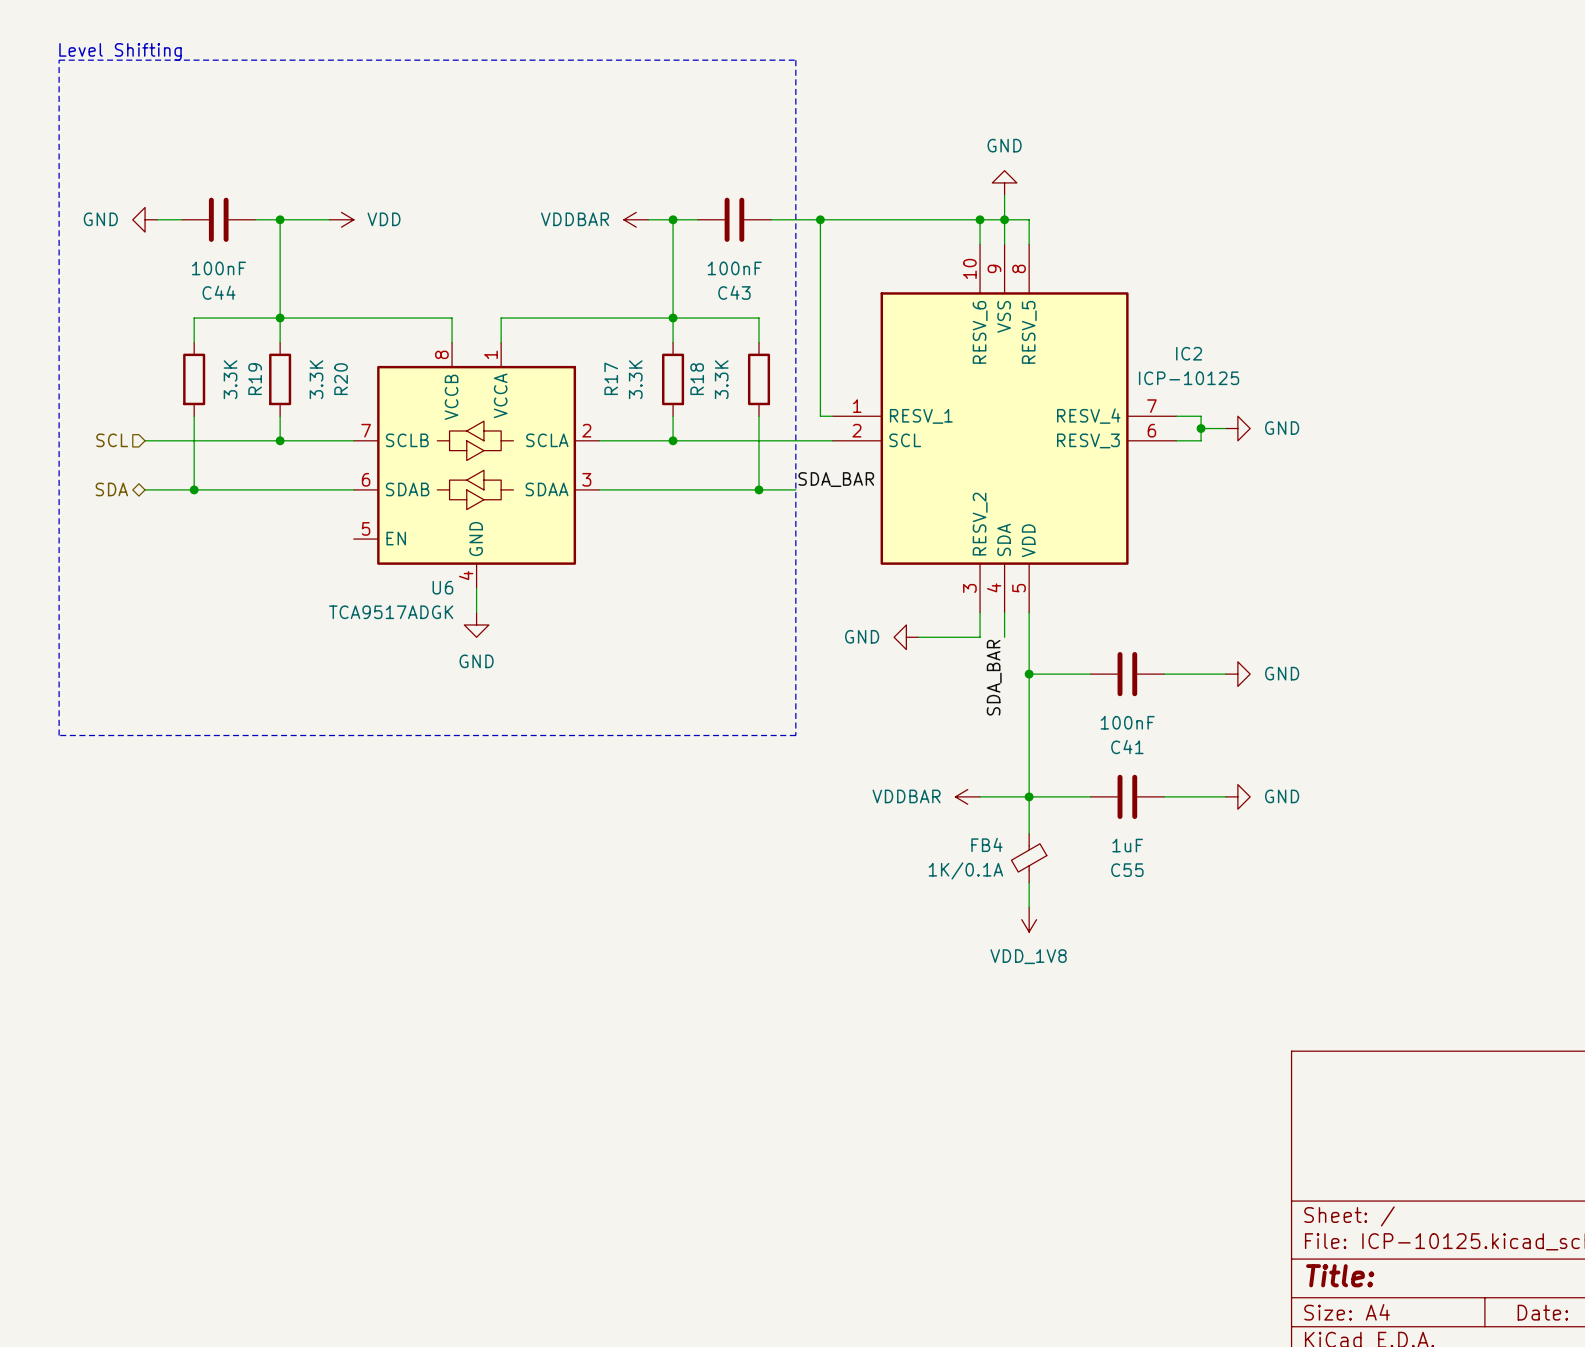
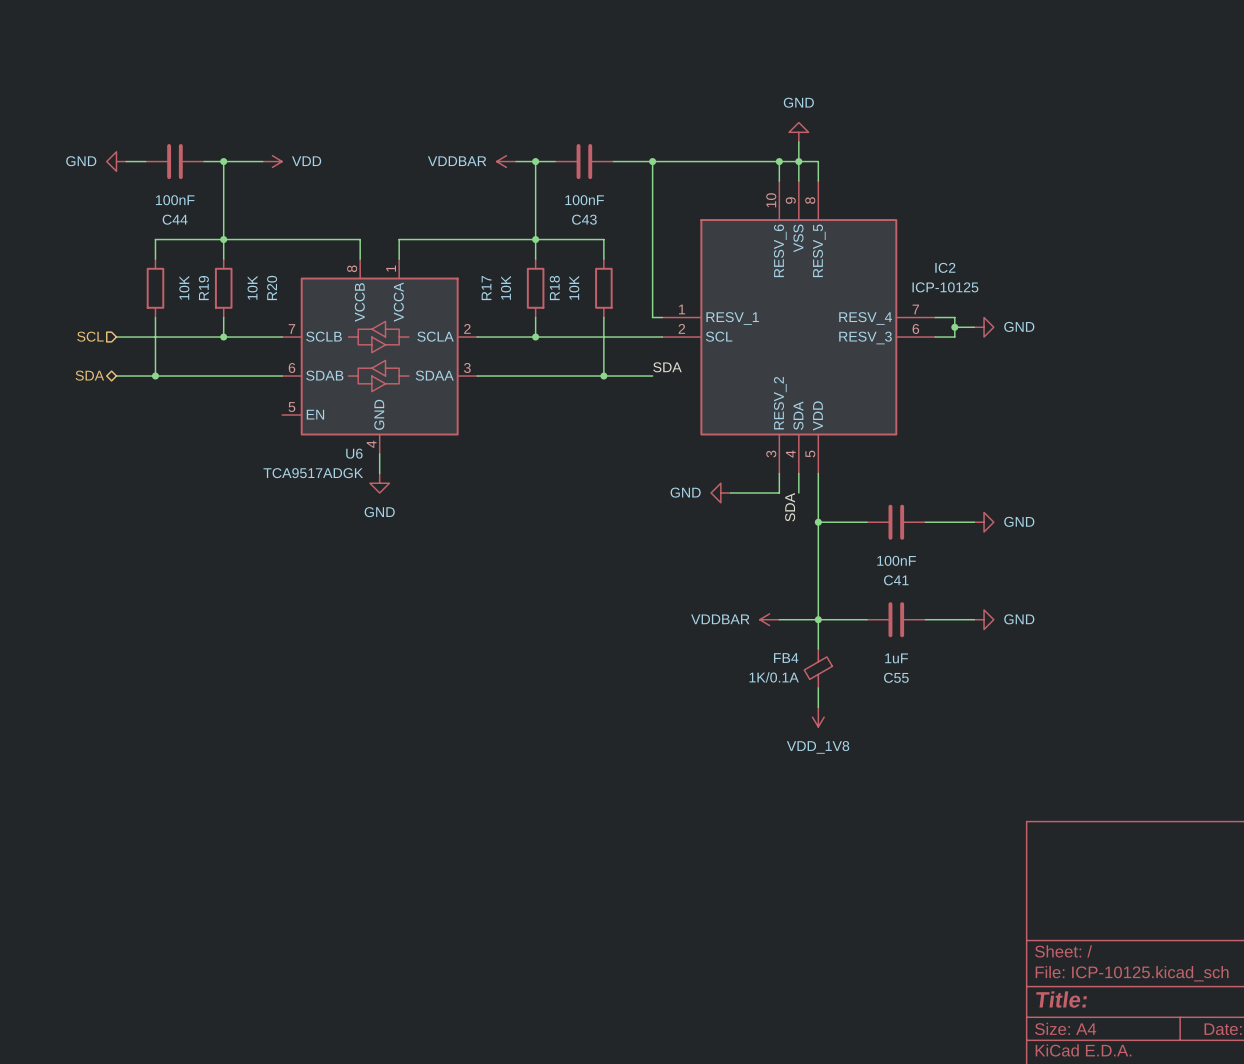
text: Level Shifting (120, 51) -> none
line: (59, 60) (795, 60) (795, 735) (59, 735) (59, 60) -> none
R19 value: 3.3K (230, 379) -> 10K (184, 287)
R20 value: 3.3K (316, 379) -> 10K (252, 287)
R17 value: 3.3K (635, 379) -> 10K (506, 287)
R18 value: 3.3K (721, 379) -> 10K (574, 287)
label: none -> SDA (667, 367)
label: SDA_BAR (836, 479) -> none
wire: none -> (633, 376) (652, 376)
label: SDA_BAR (994, 677) -> SDA (790, 507)

